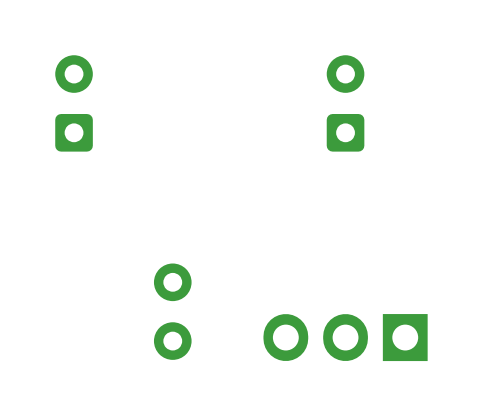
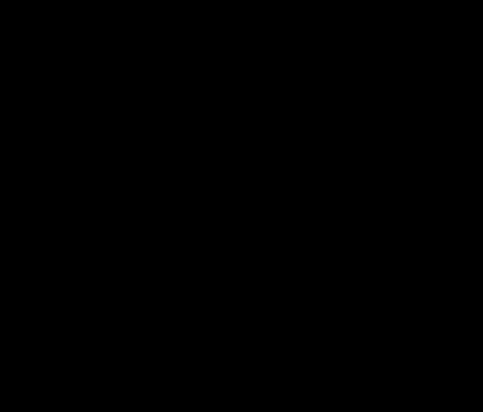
part: (74, 103) -> none
part: (345, 103) -> none
part: (172, 311) -> none
part: (345, 337) -> none

